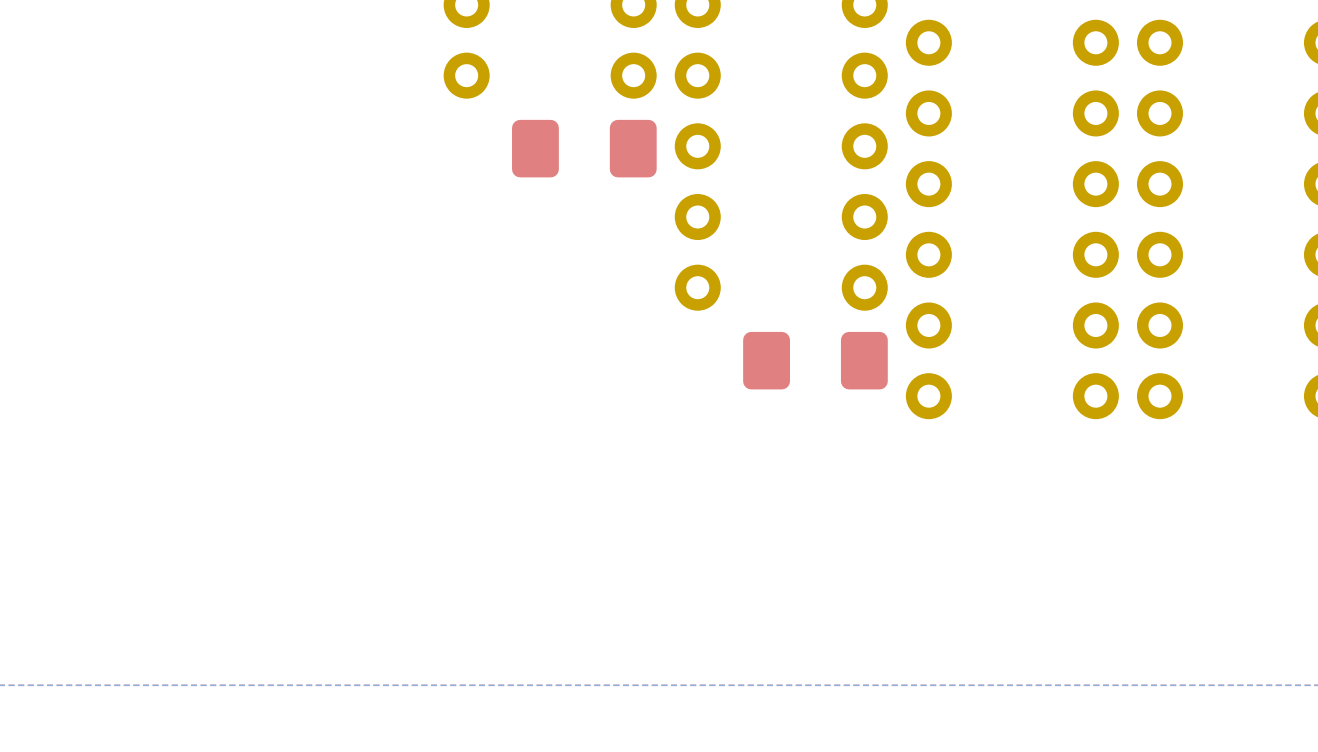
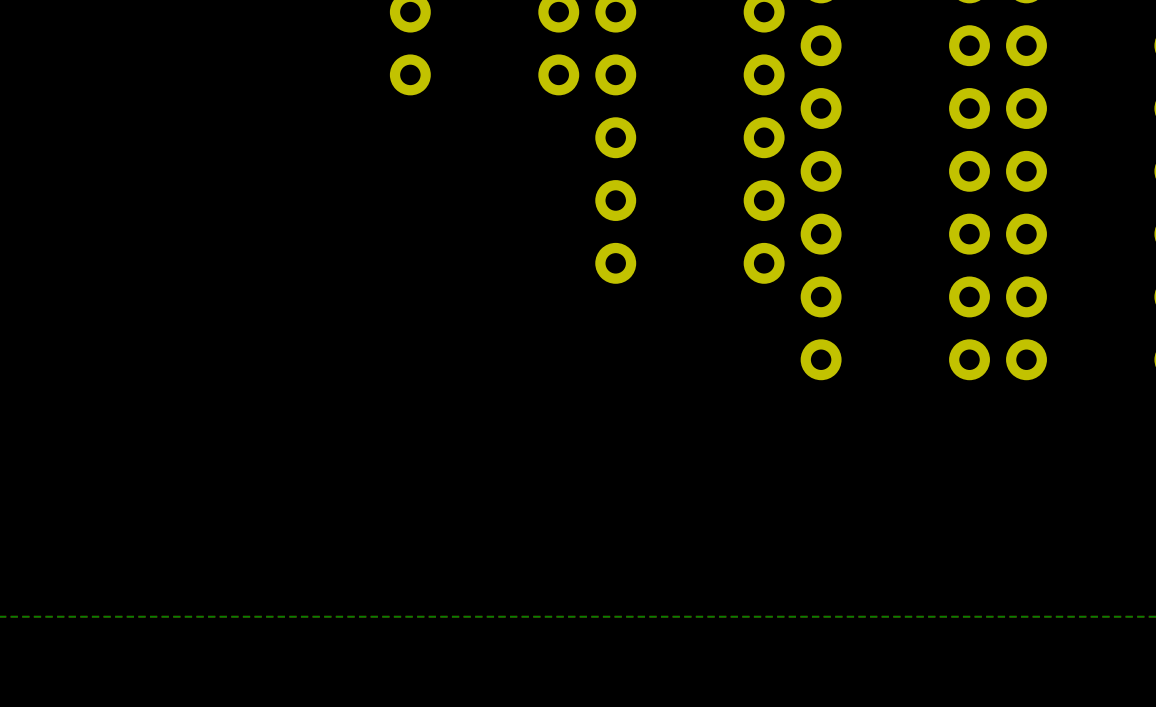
part: (584, 148) -> none
part: (815, 360) -> none

